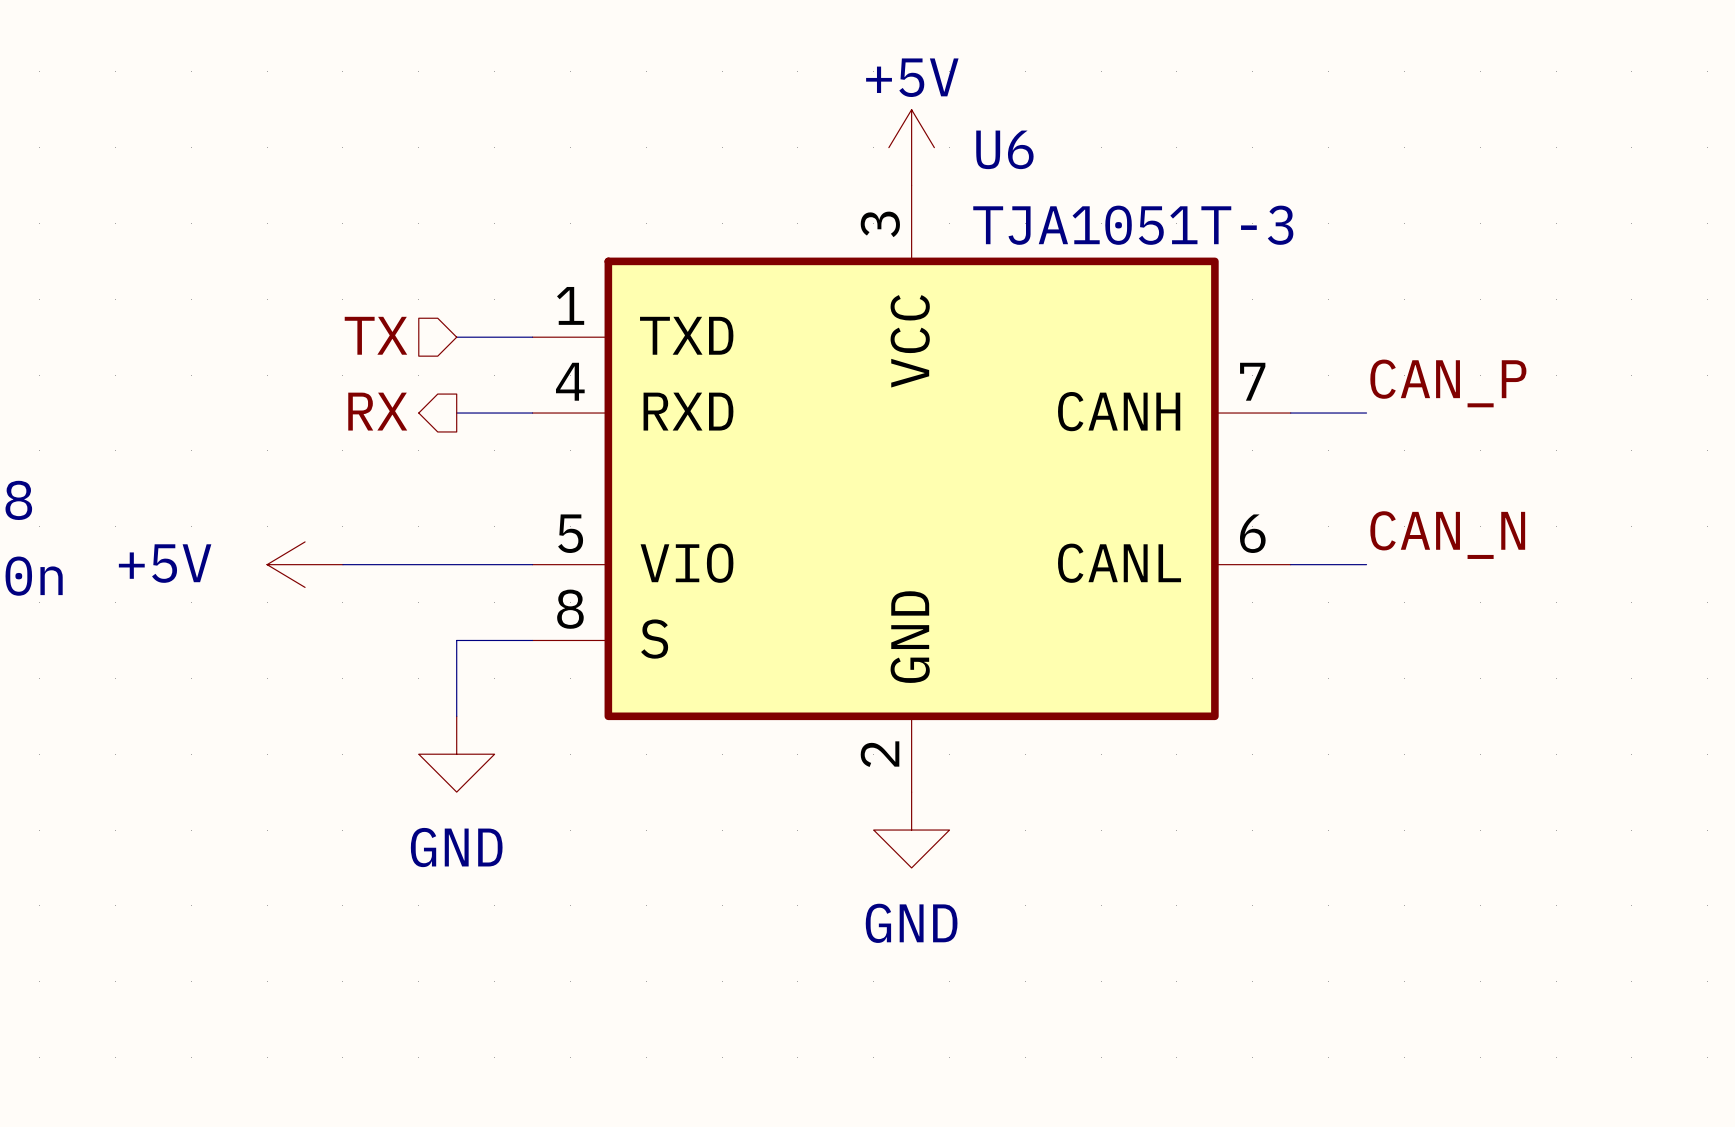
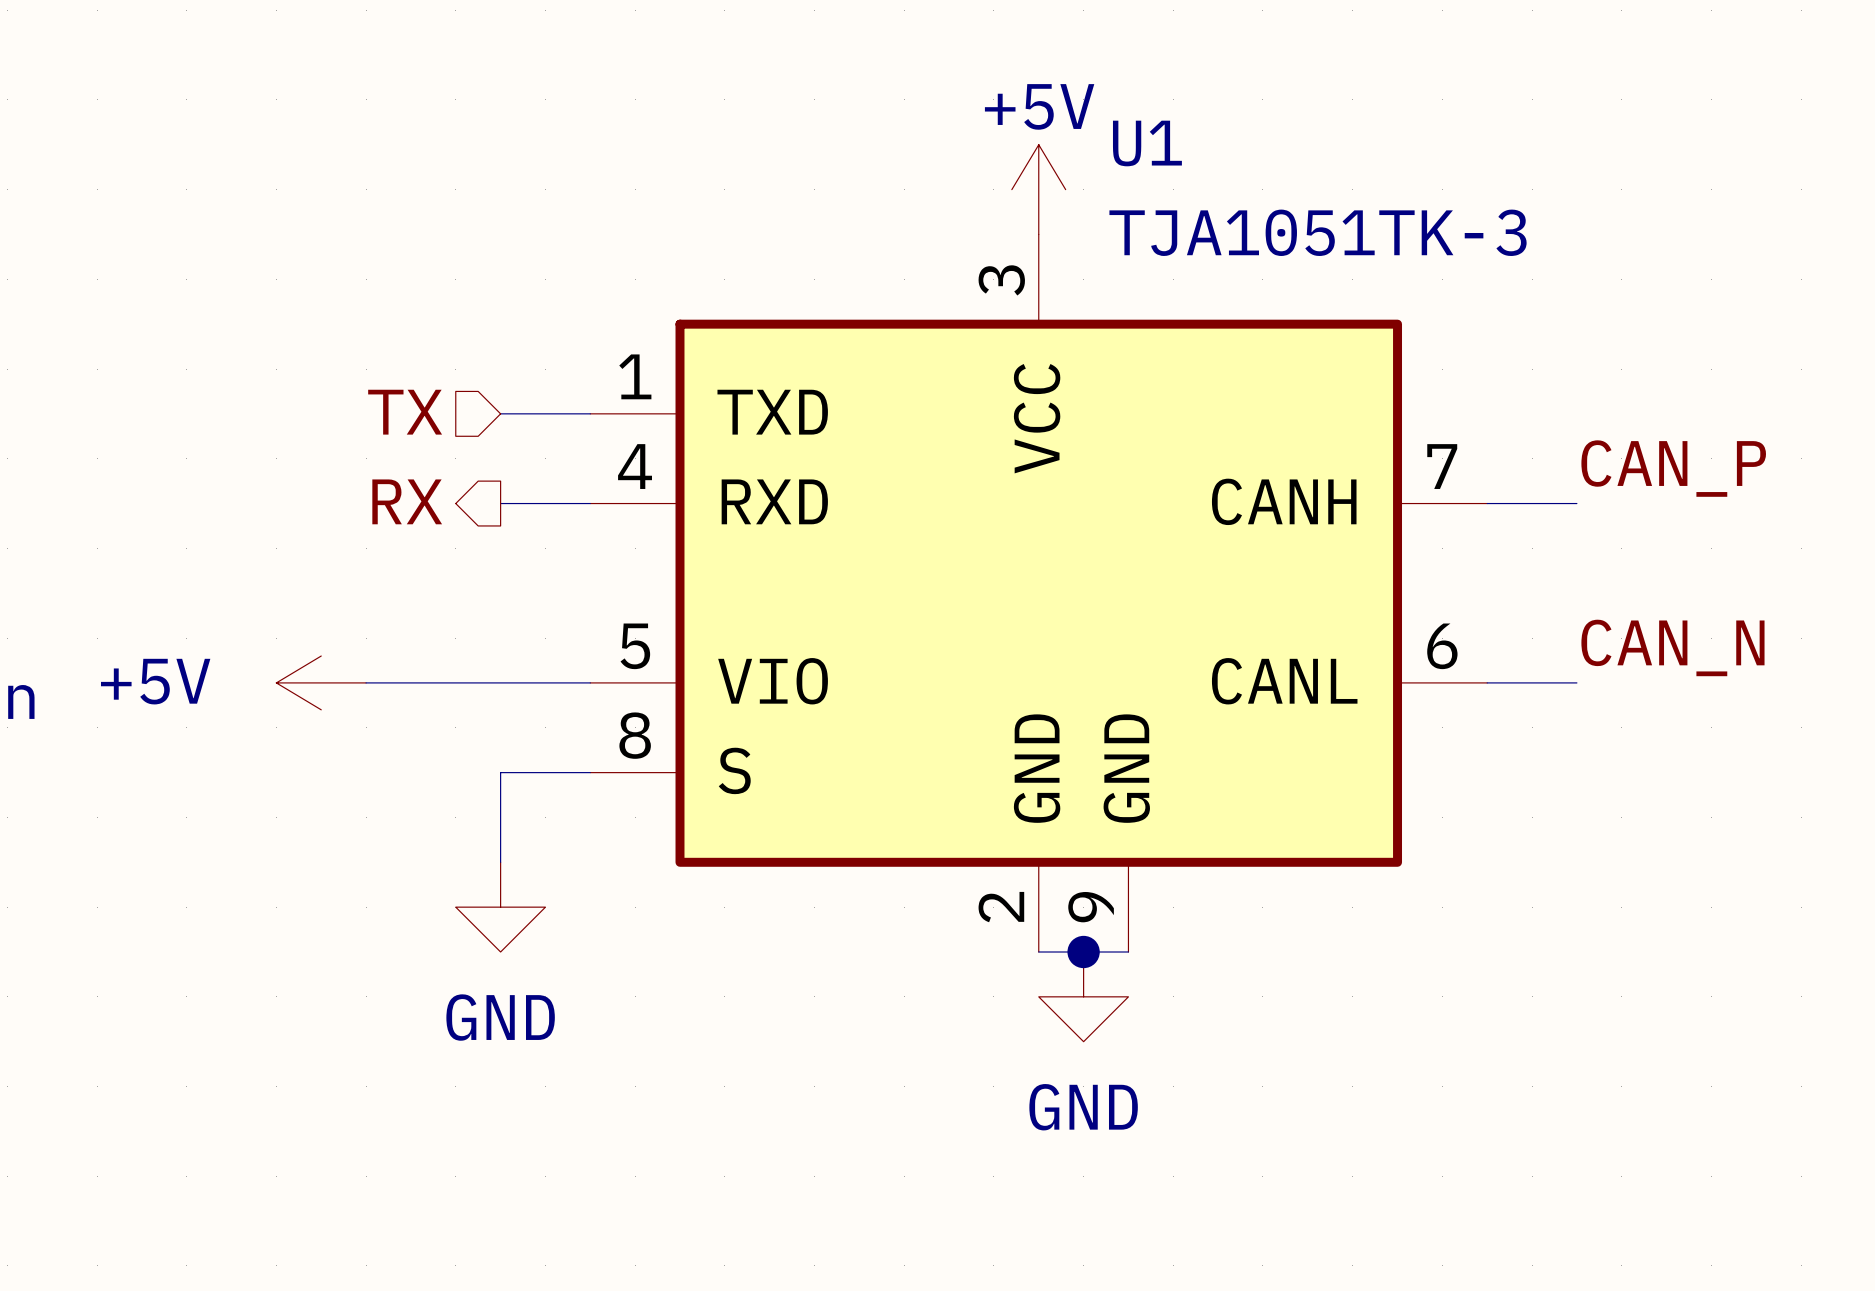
U6: TJA1051T-3 (911, 488) -> none
U1: none -> TJA1051TK-3 (1038, 593)
wire: none -> (1038, 952) (1128, 952)
junction: none -> (1083, 952)
power symbol position: GND (911, 830) -> GND (1083, 996)

